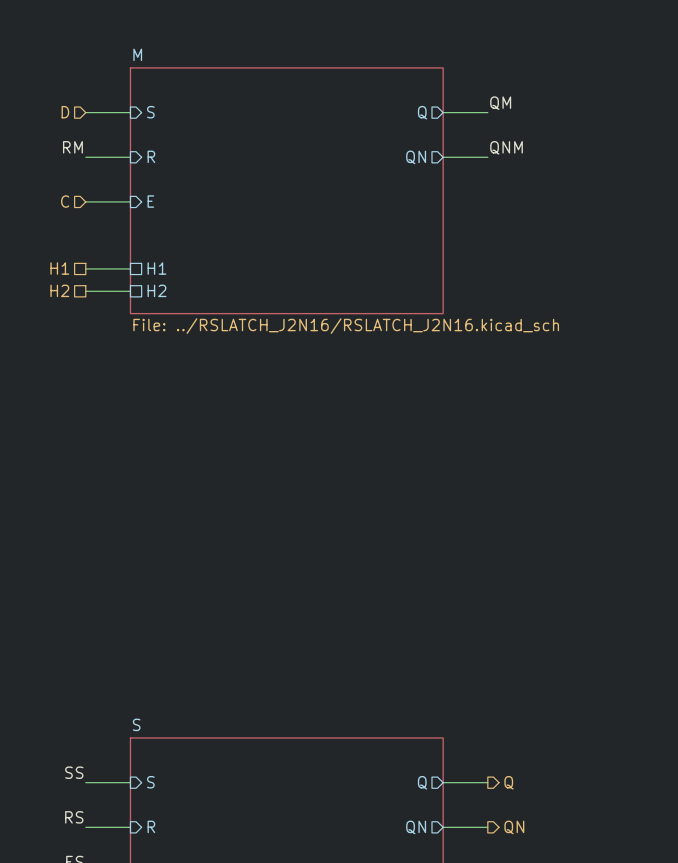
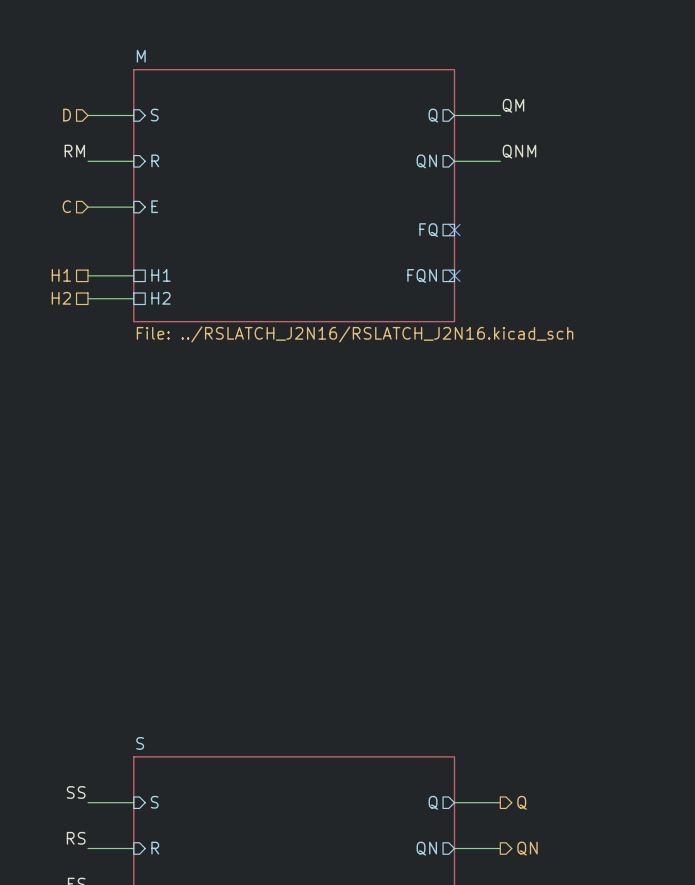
sheet pin: none -> FQ (428, 230)
no-connect mark: none -> (454, 230)
no-connect mark: none -> (454, 275)
sheet pin: none -> FQN (422, 275)

